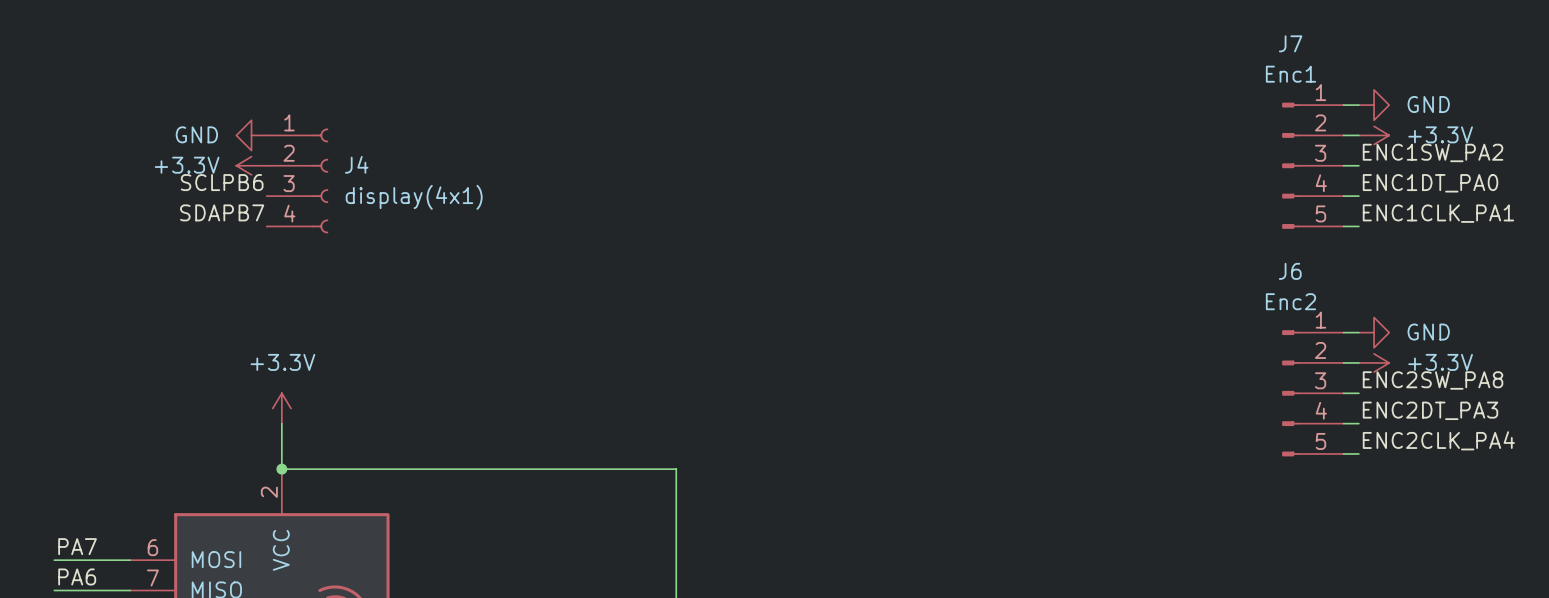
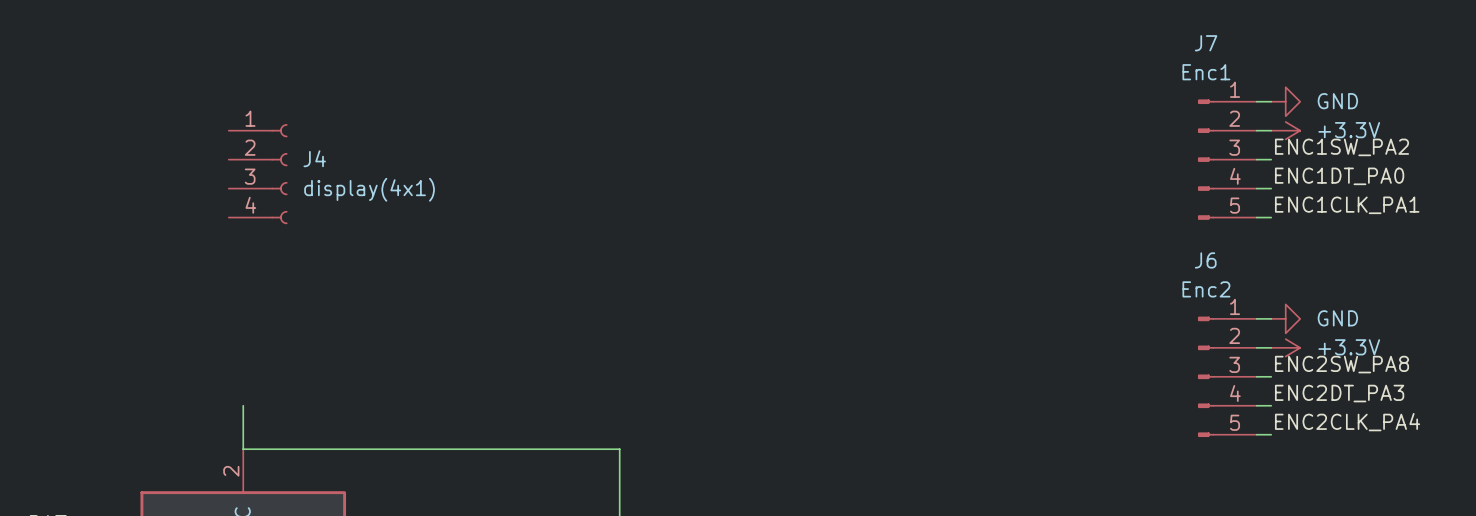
power symbol: GND (251, 135) -> none
power symbol: +3.3V (251, 165) -> none
label: SCLPB6 (222, 182) -> none
label: SDAPB7 (222, 212) -> none
power symbol: +3.3V (281, 408) -> none
junction: (281, 469) -> none

